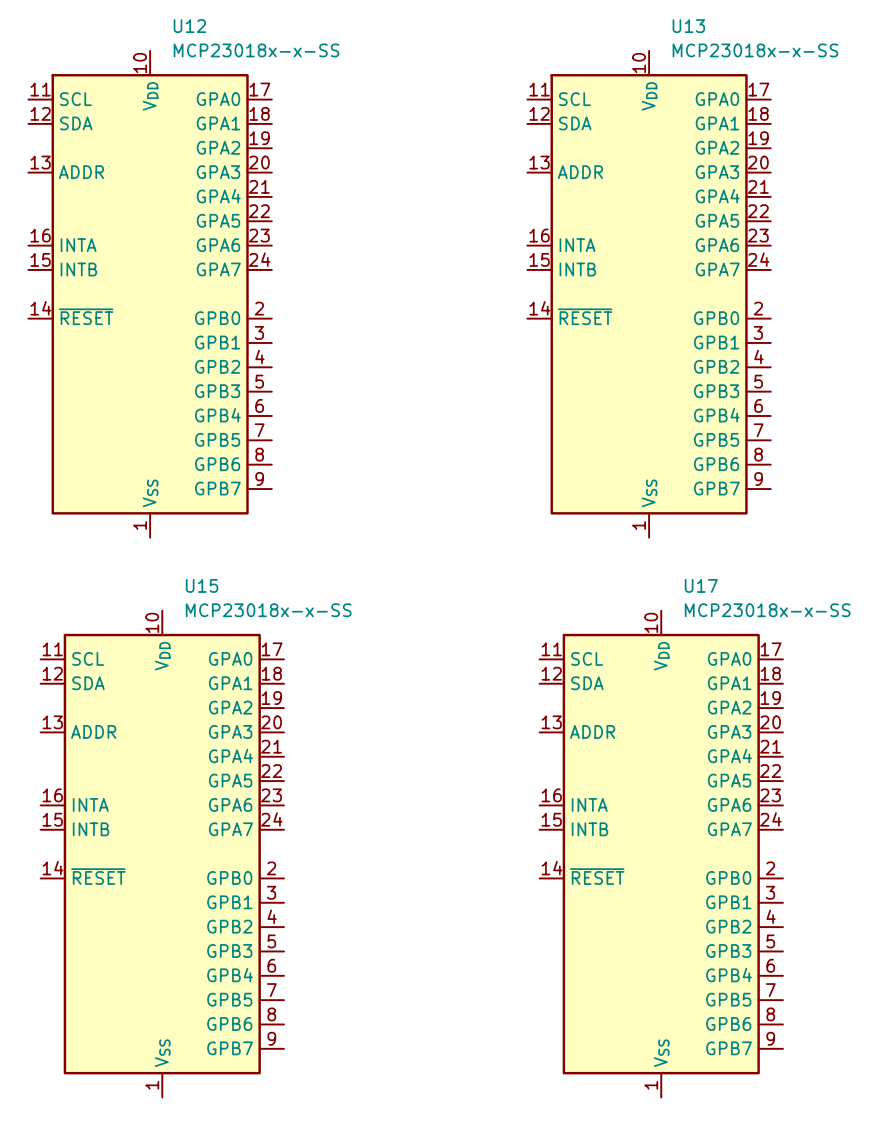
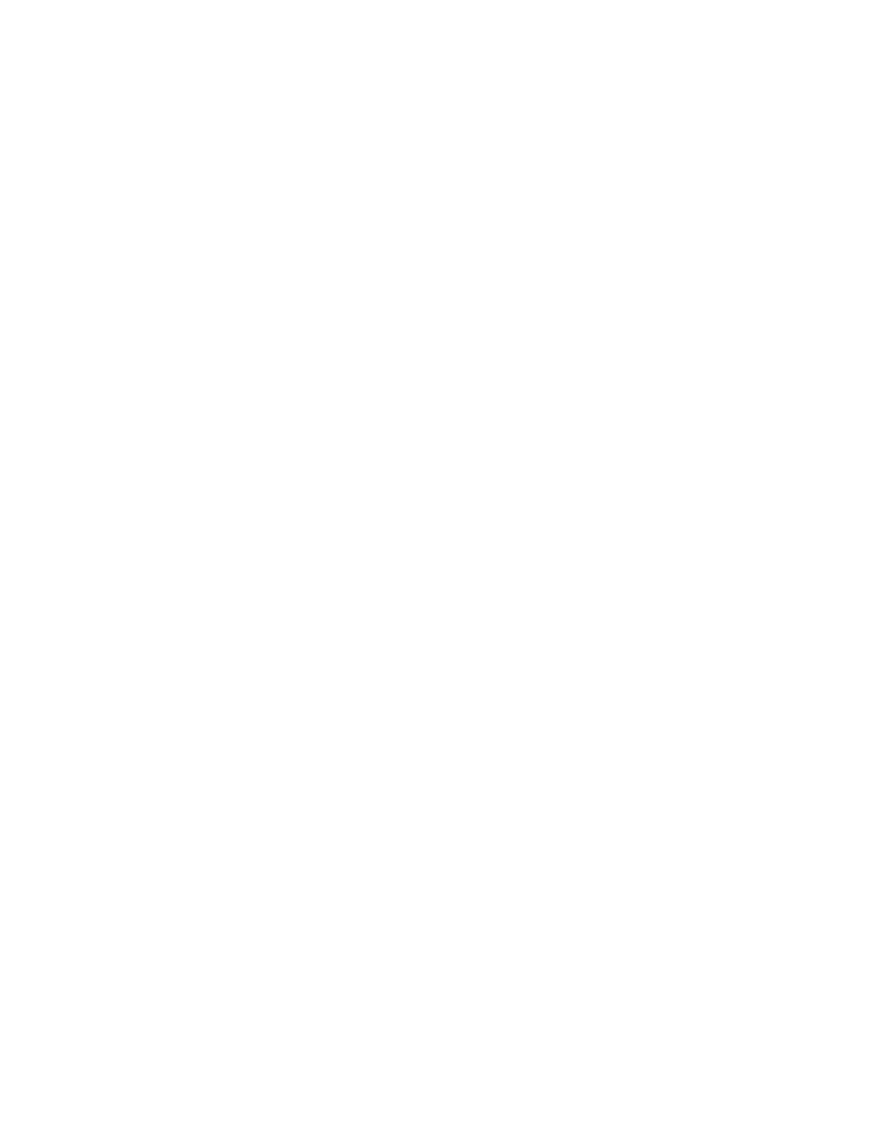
U12: MCP23018x-x-SS (150, 294) -> none
U13: MCP23018x-x-SS (649, 294) -> none
U15: MCP23018x-x-SS (162, 854) -> none
U17: MCP23018x-x-SS (661, 854) -> none

